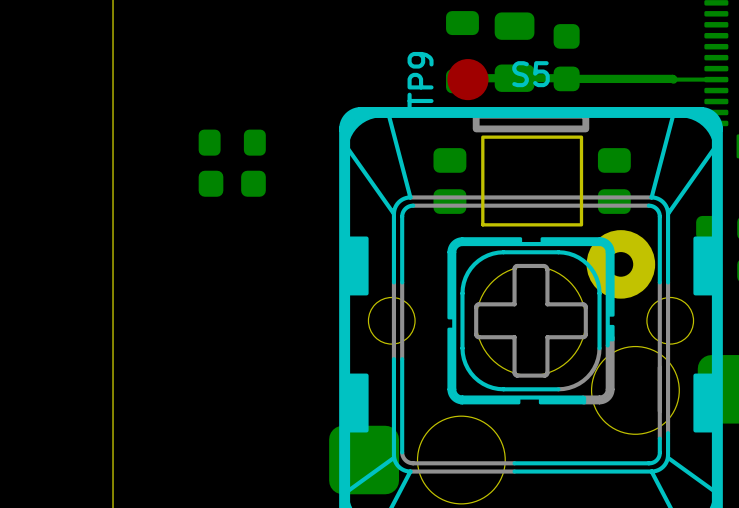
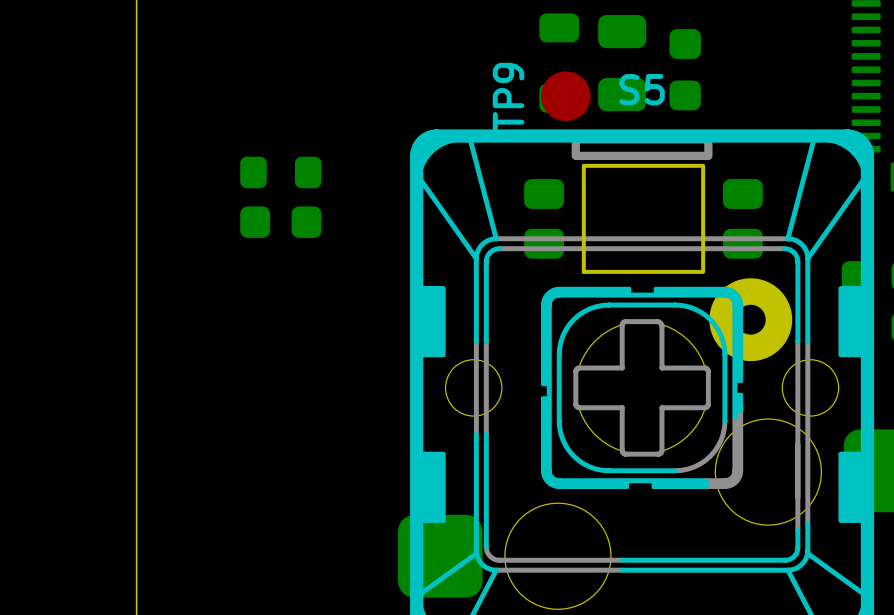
bottom track: (716, 79) (465, 78) (462, 81) -> none

